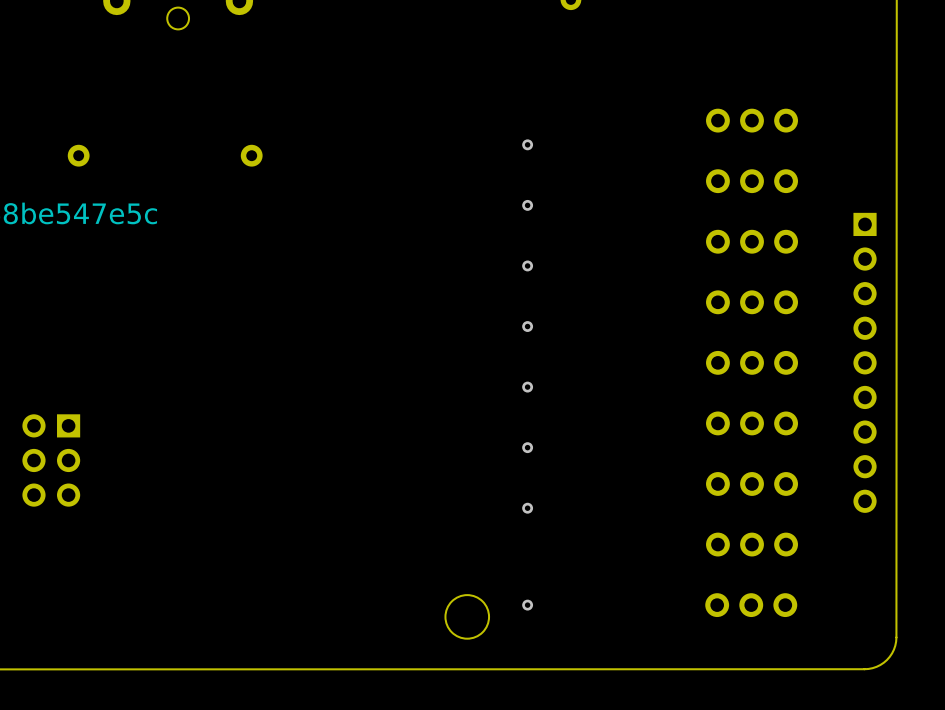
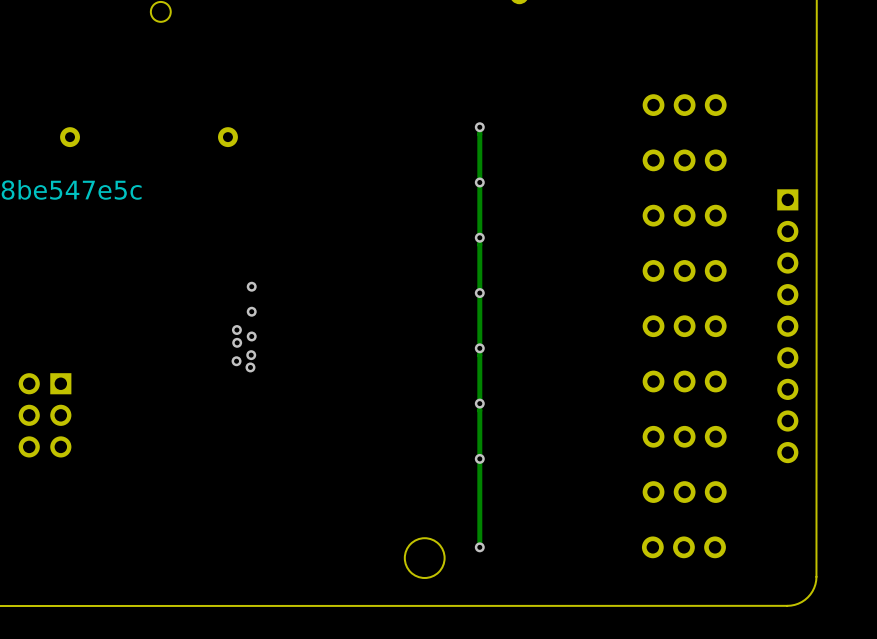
track: none -> (479, 127) (479, 547)
via: none -> (251, 286)
via: none -> (251, 311)
via: none -> (236, 330)
via: none -> (251, 336)
via: none -> (237, 342)
via: none -> (251, 355)
via: none -> (236, 361)
via: none -> (250, 367)

